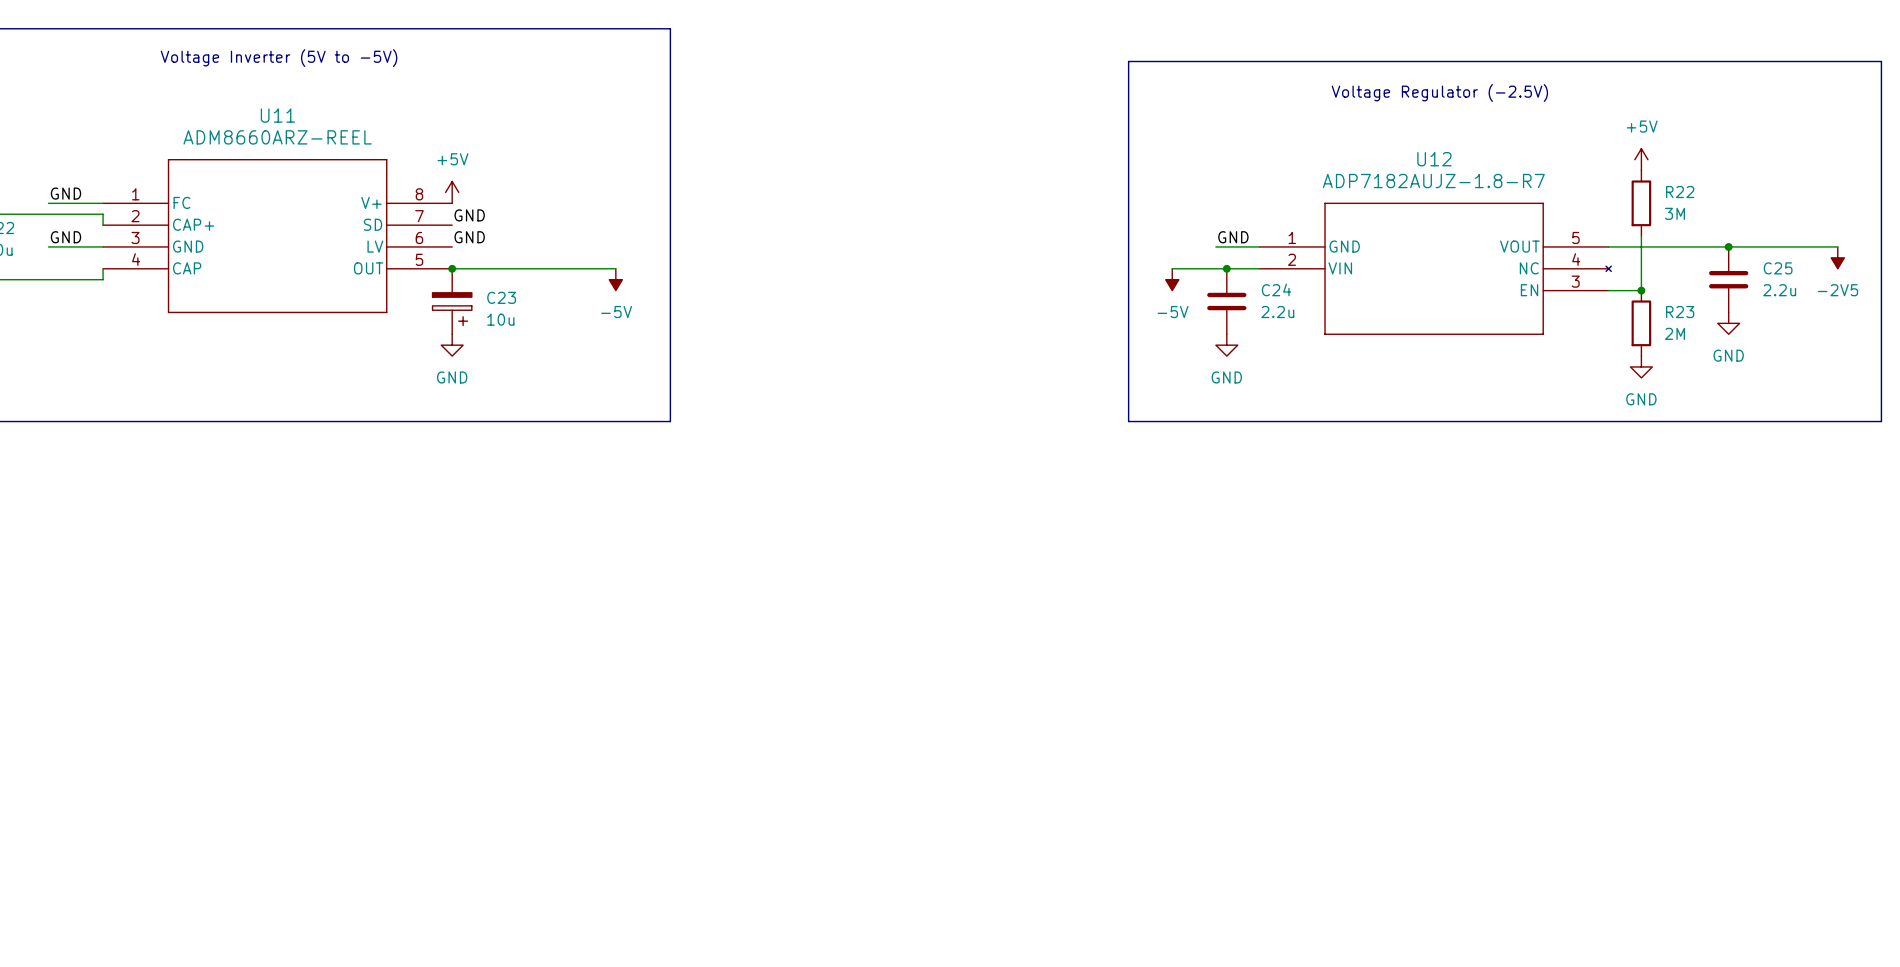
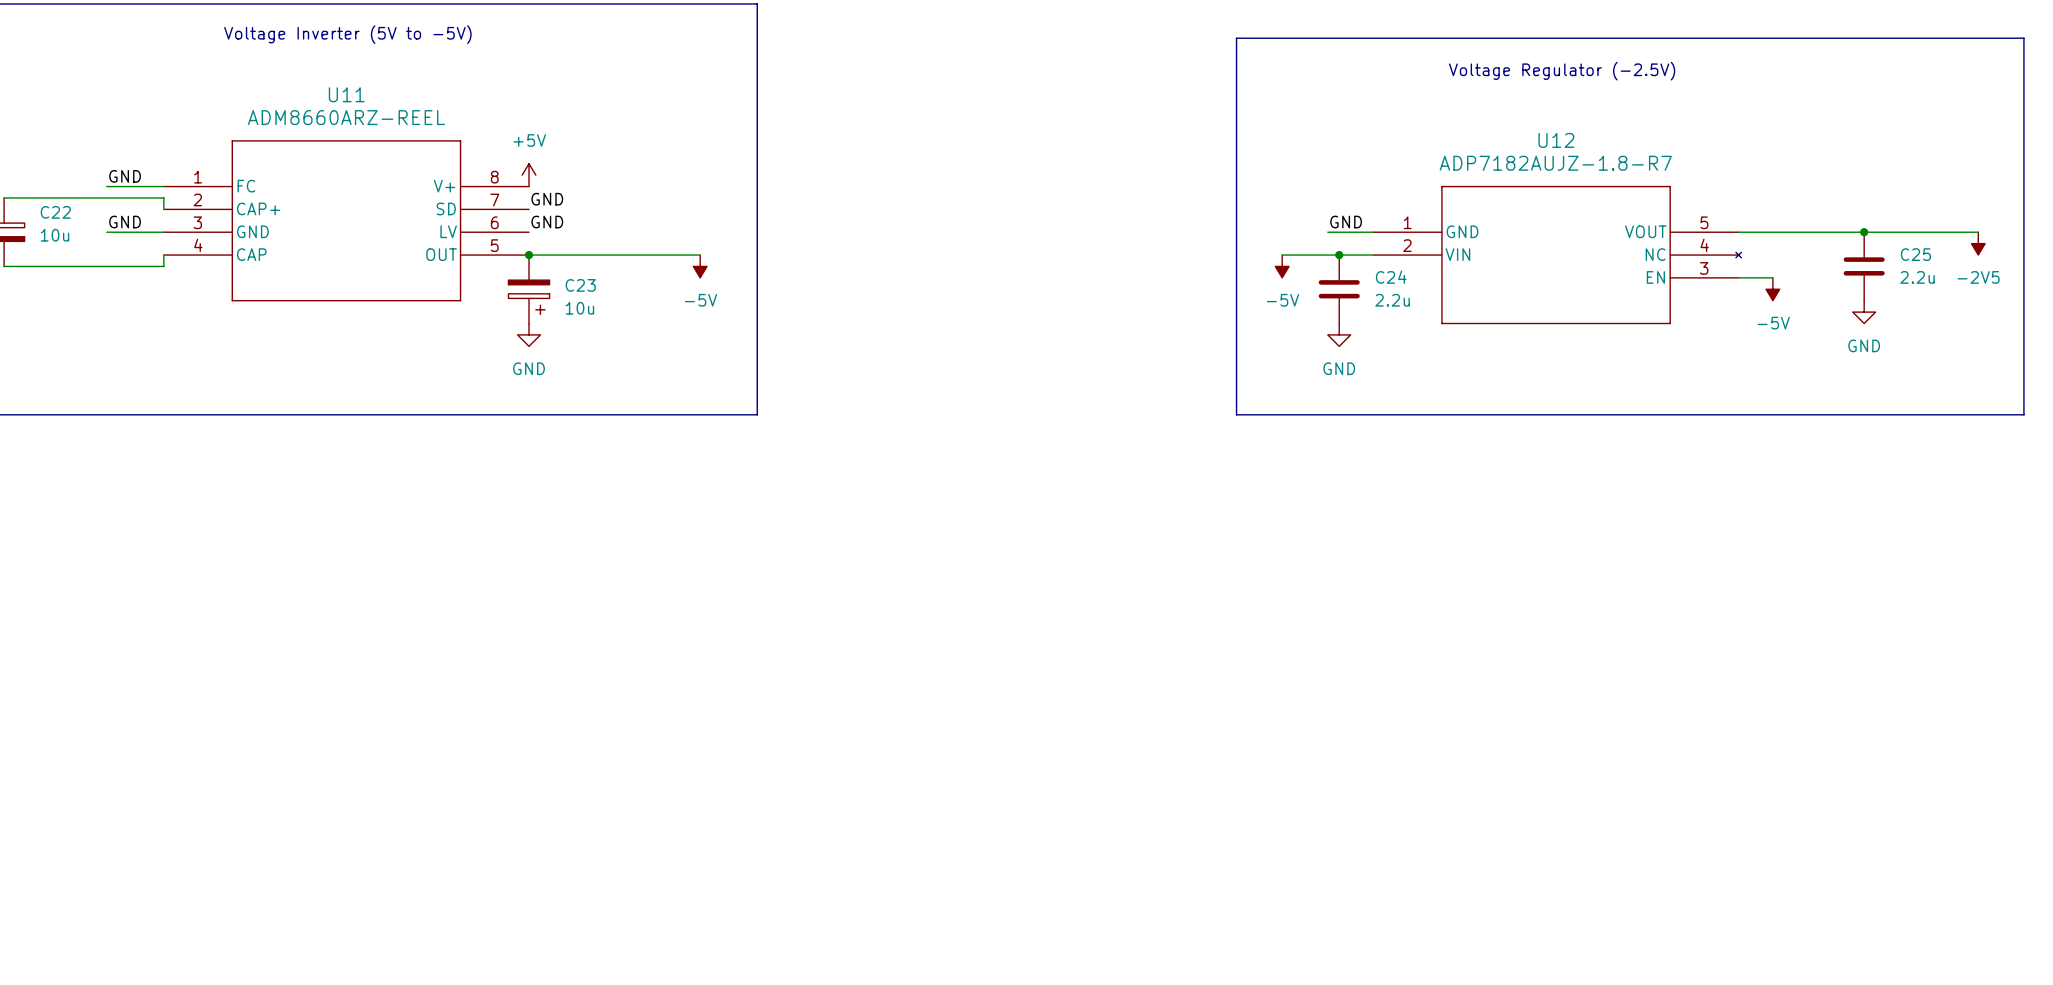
power symbol: +5V (1641, 159) -> none
R22: 3M (1641, 203) -> none
wire: (1641, 236) (1641, 290) -> none
junction: (1641, 290) -> none
power symbol: none -> -5V (1772, 289)
R23: 2M (1641, 323) -> none
power symbol: GND (1641, 366) -> none

